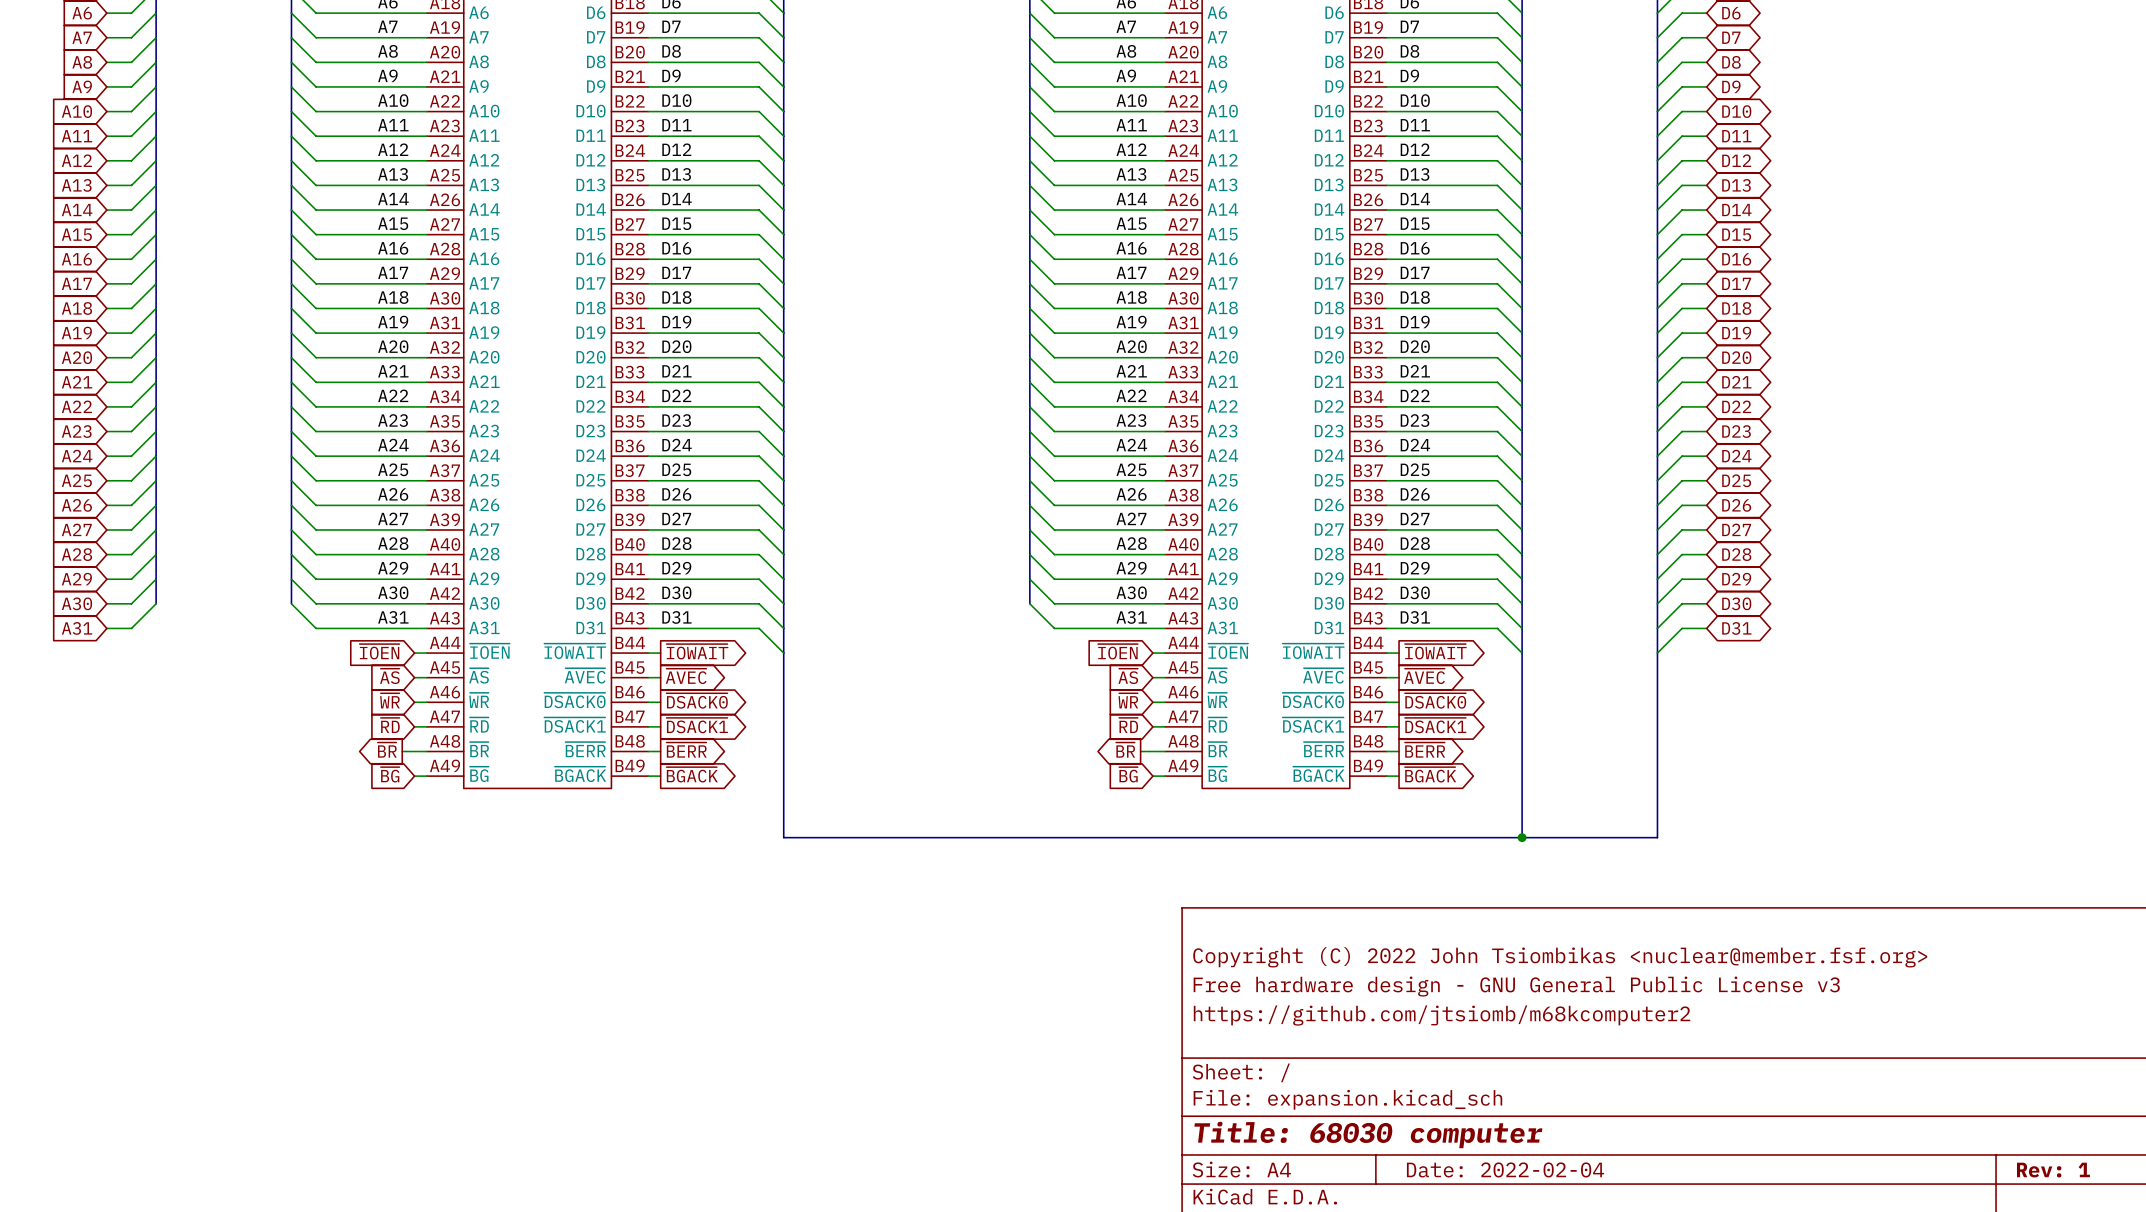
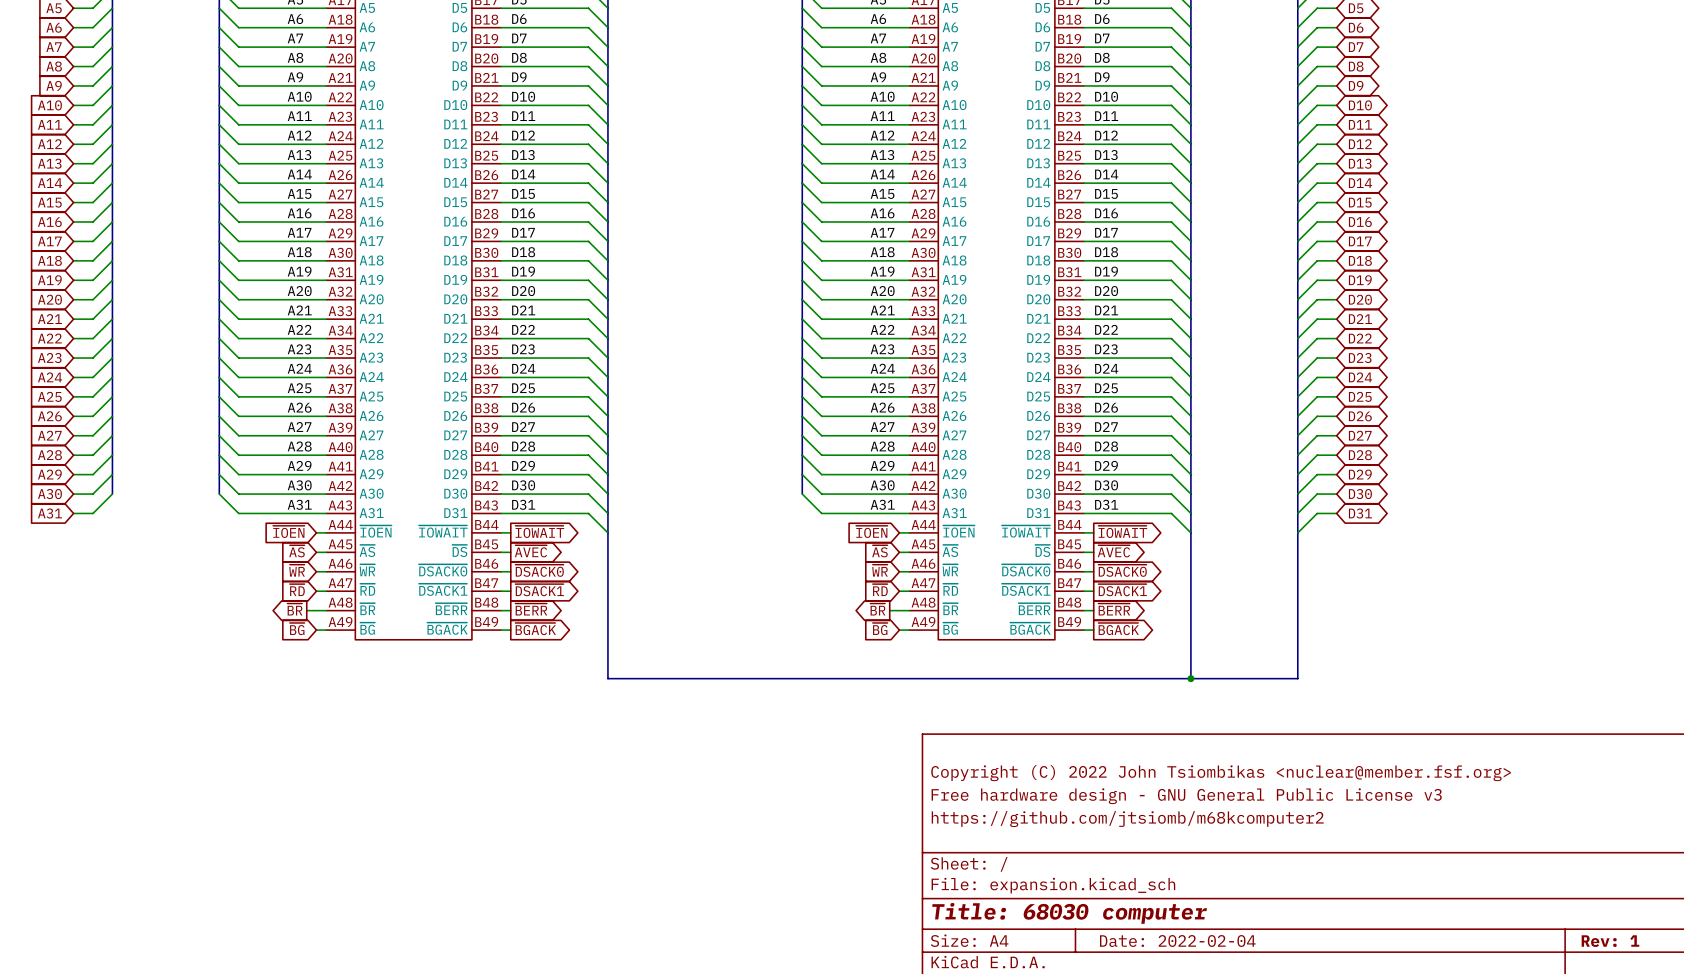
part pin name: ~{AVEC} (585, 675) -> ~{DS} (459, 550)
part pin name: ~{AVEC} (1323, 675) -> ~{DS} (1042, 550)

